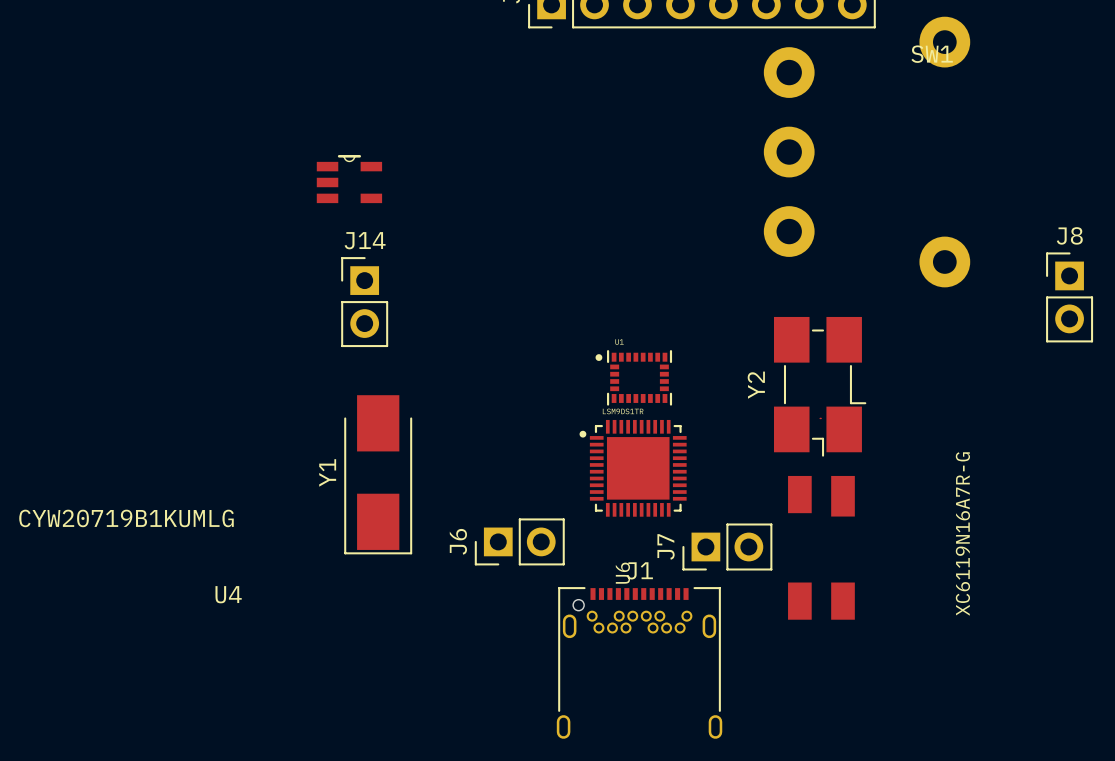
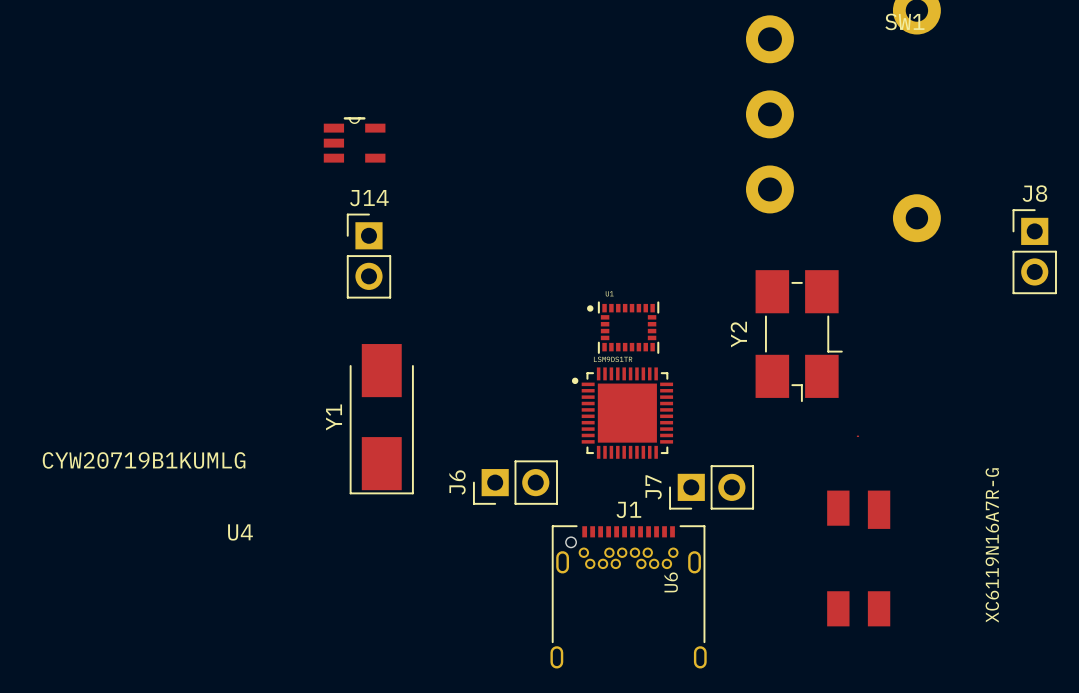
U6 position: (821, 519) -> (858, 531)

